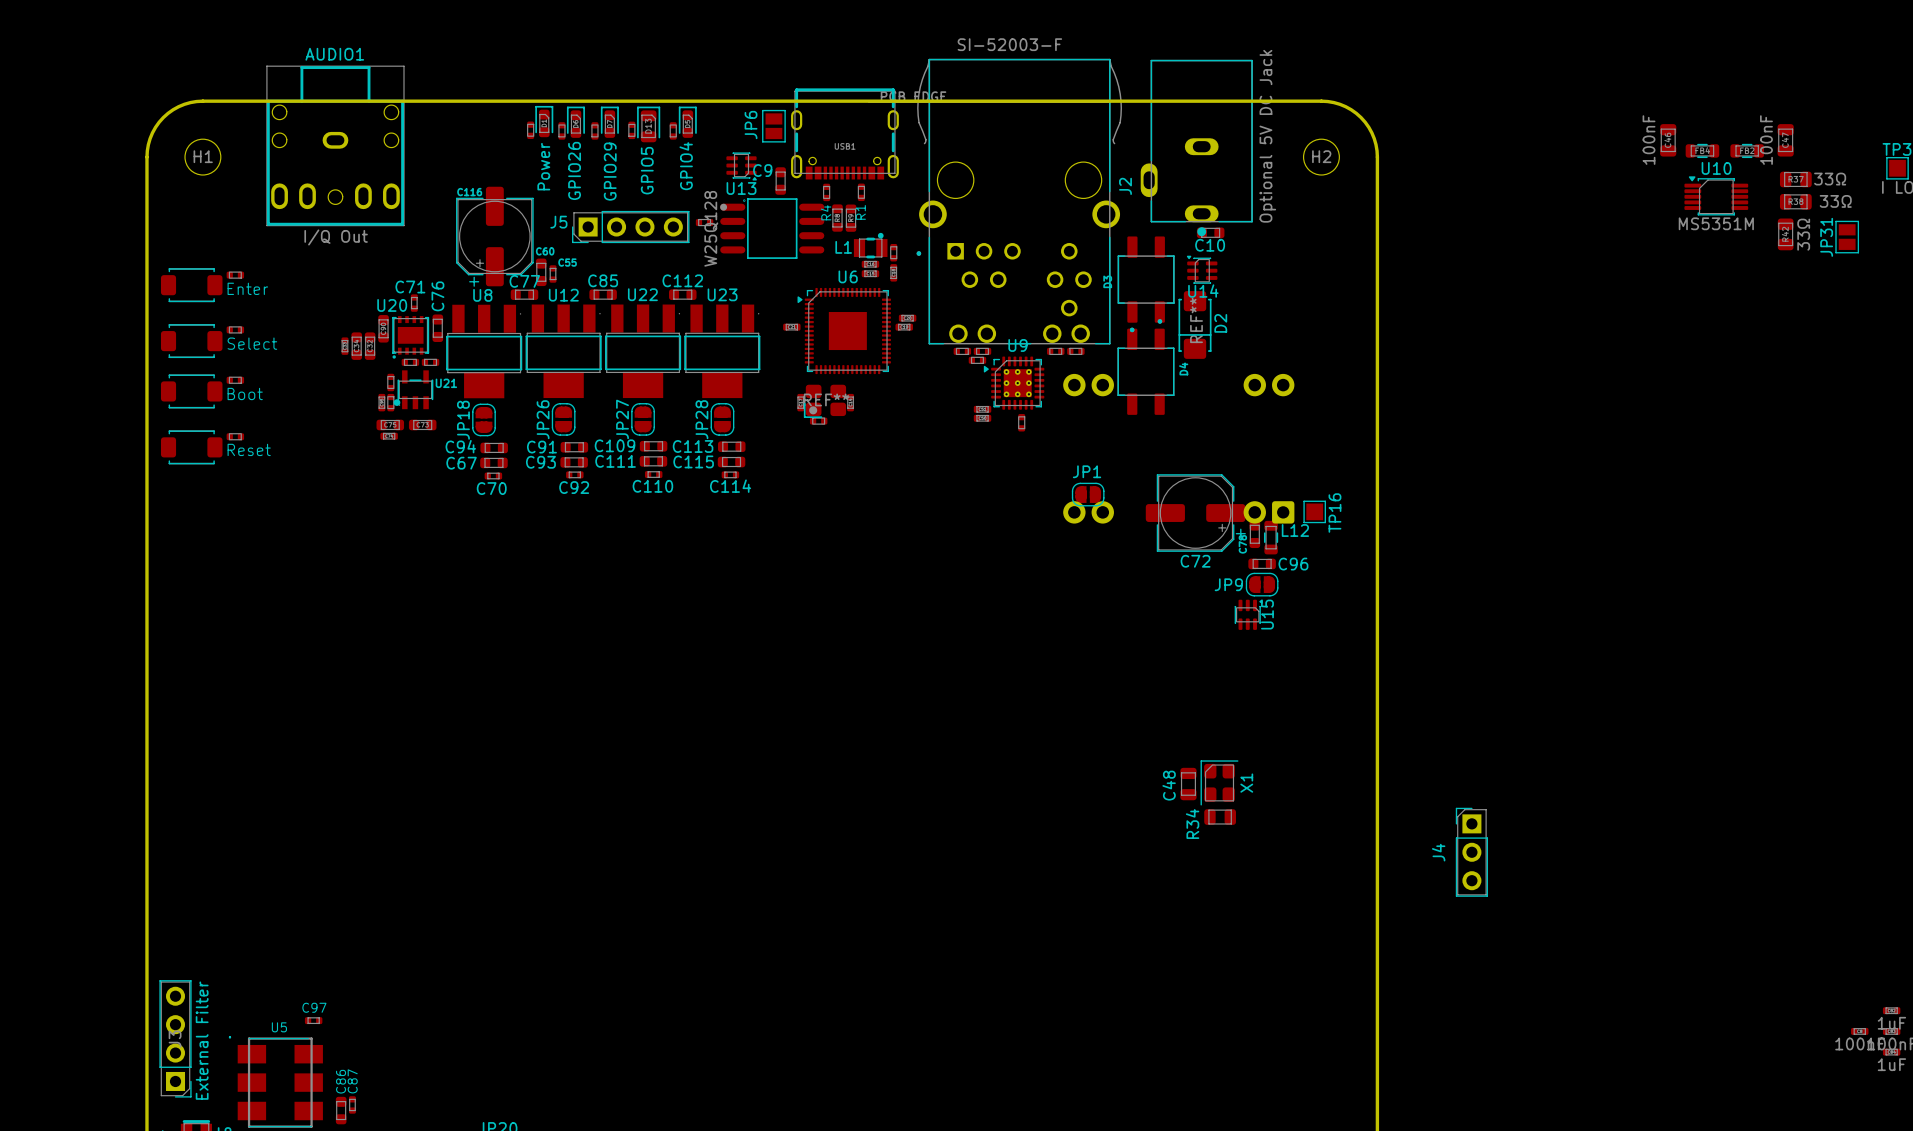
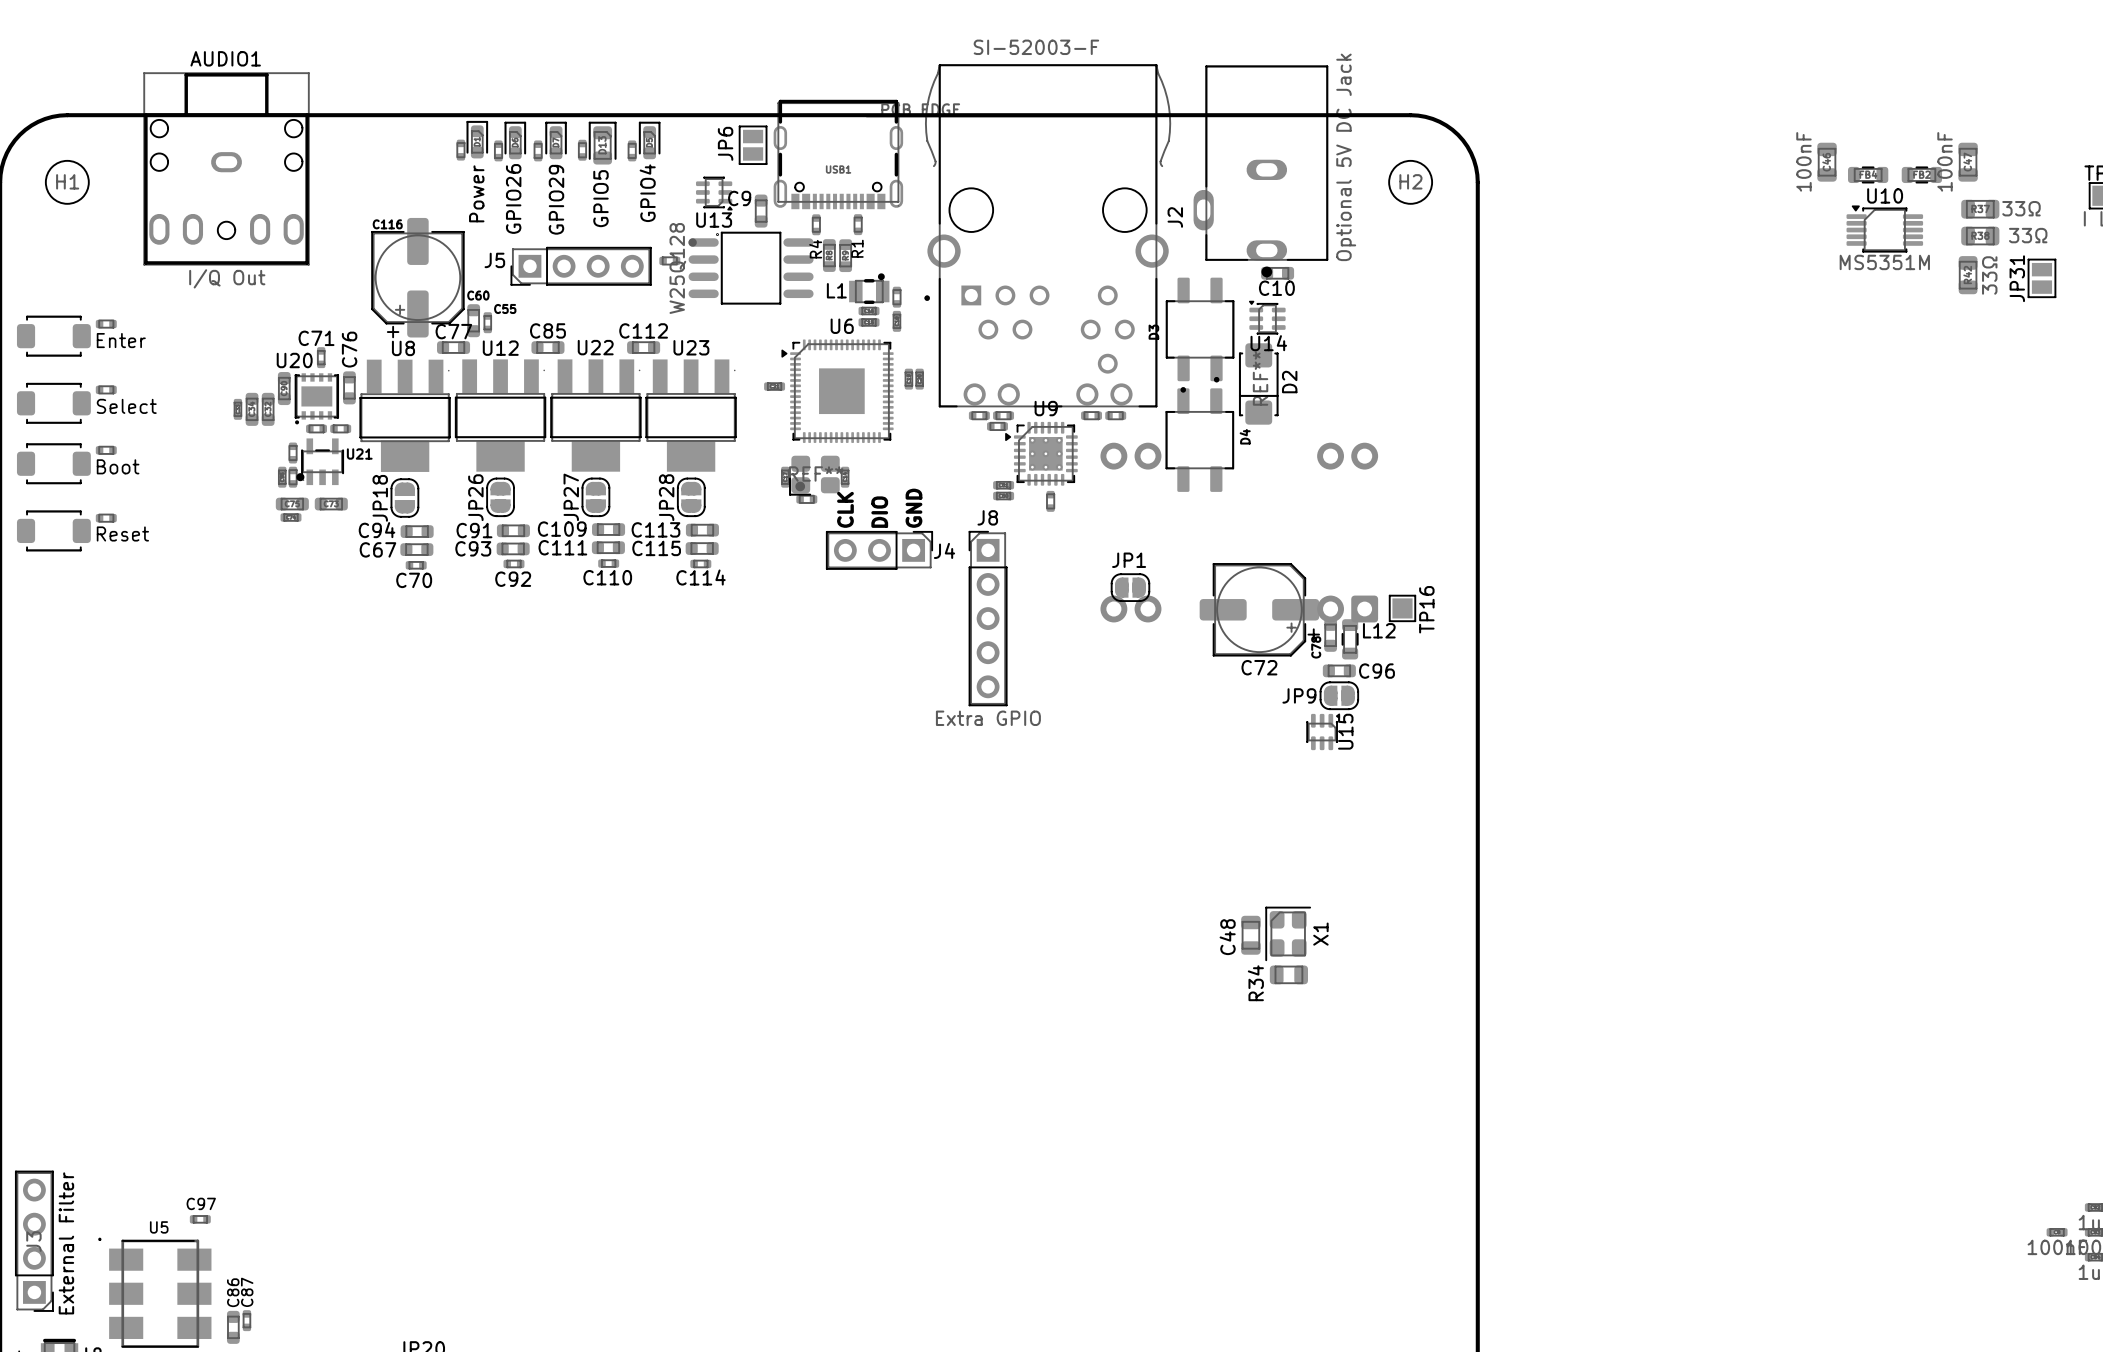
part rotation: 0° (907, 318) -> 90° clockwise (919, 379)
part rotation: 0° (904, 327) -> 90° clockwise (908, 379)
text: none -> GND (913, 508)
text: none -> CLK (845, 509)
text: none -> DIO (879, 512)
J8: none -> Extra GPIO (988, 618)
J4 name position: J4 (1438, 852) -> J4 (944, 550)
J4 rotation: 0° (1471, 852) -> 90° clockwise (879, 550)
J4 position: (1471, 852) -> (879, 550)

